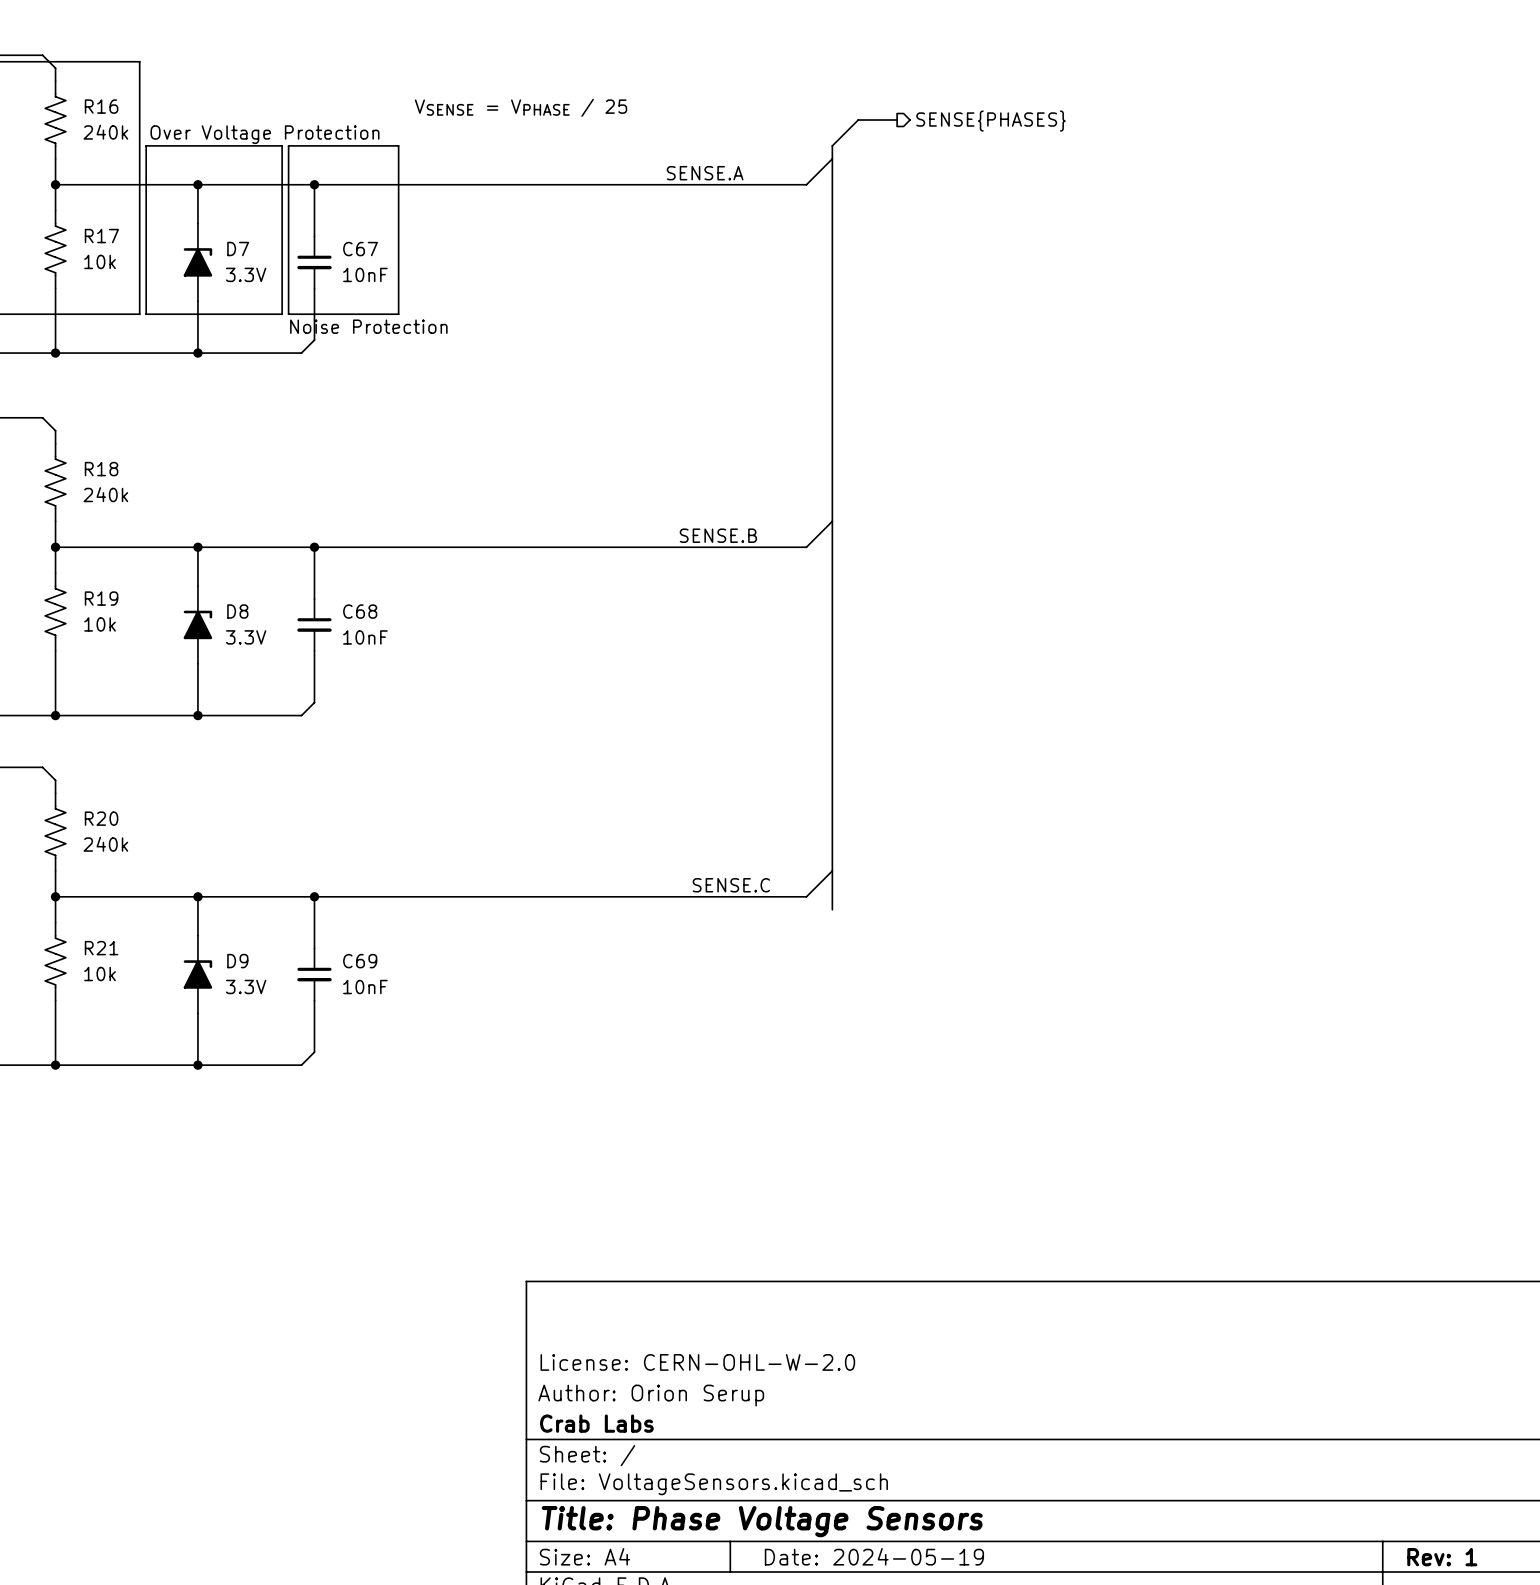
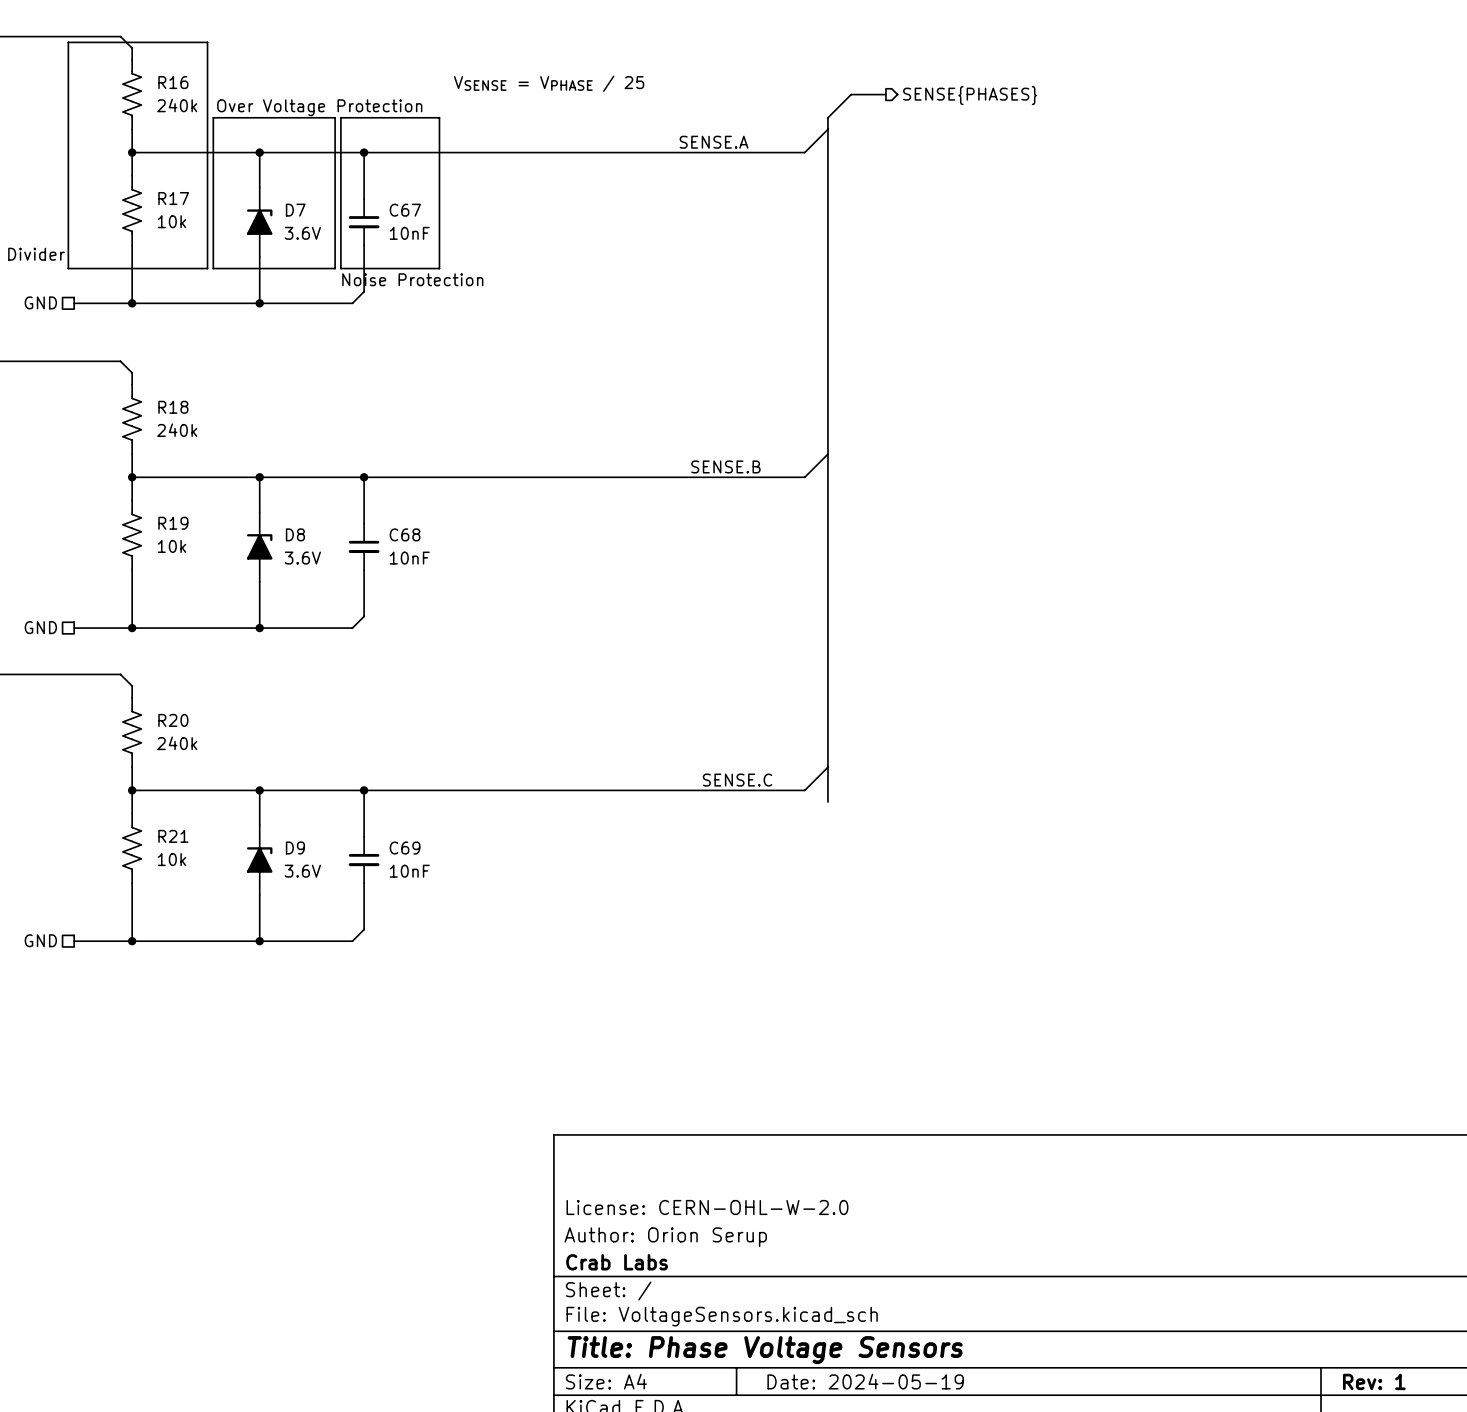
D7 value: 3.3V (246, 274) -> 3.6V (302, 233)
D8 value: 3.3V (246, 637) -> 3.6V (302, 558)
D9 value: 3.3V (246, 986) -> 3.6V (302, 871)

